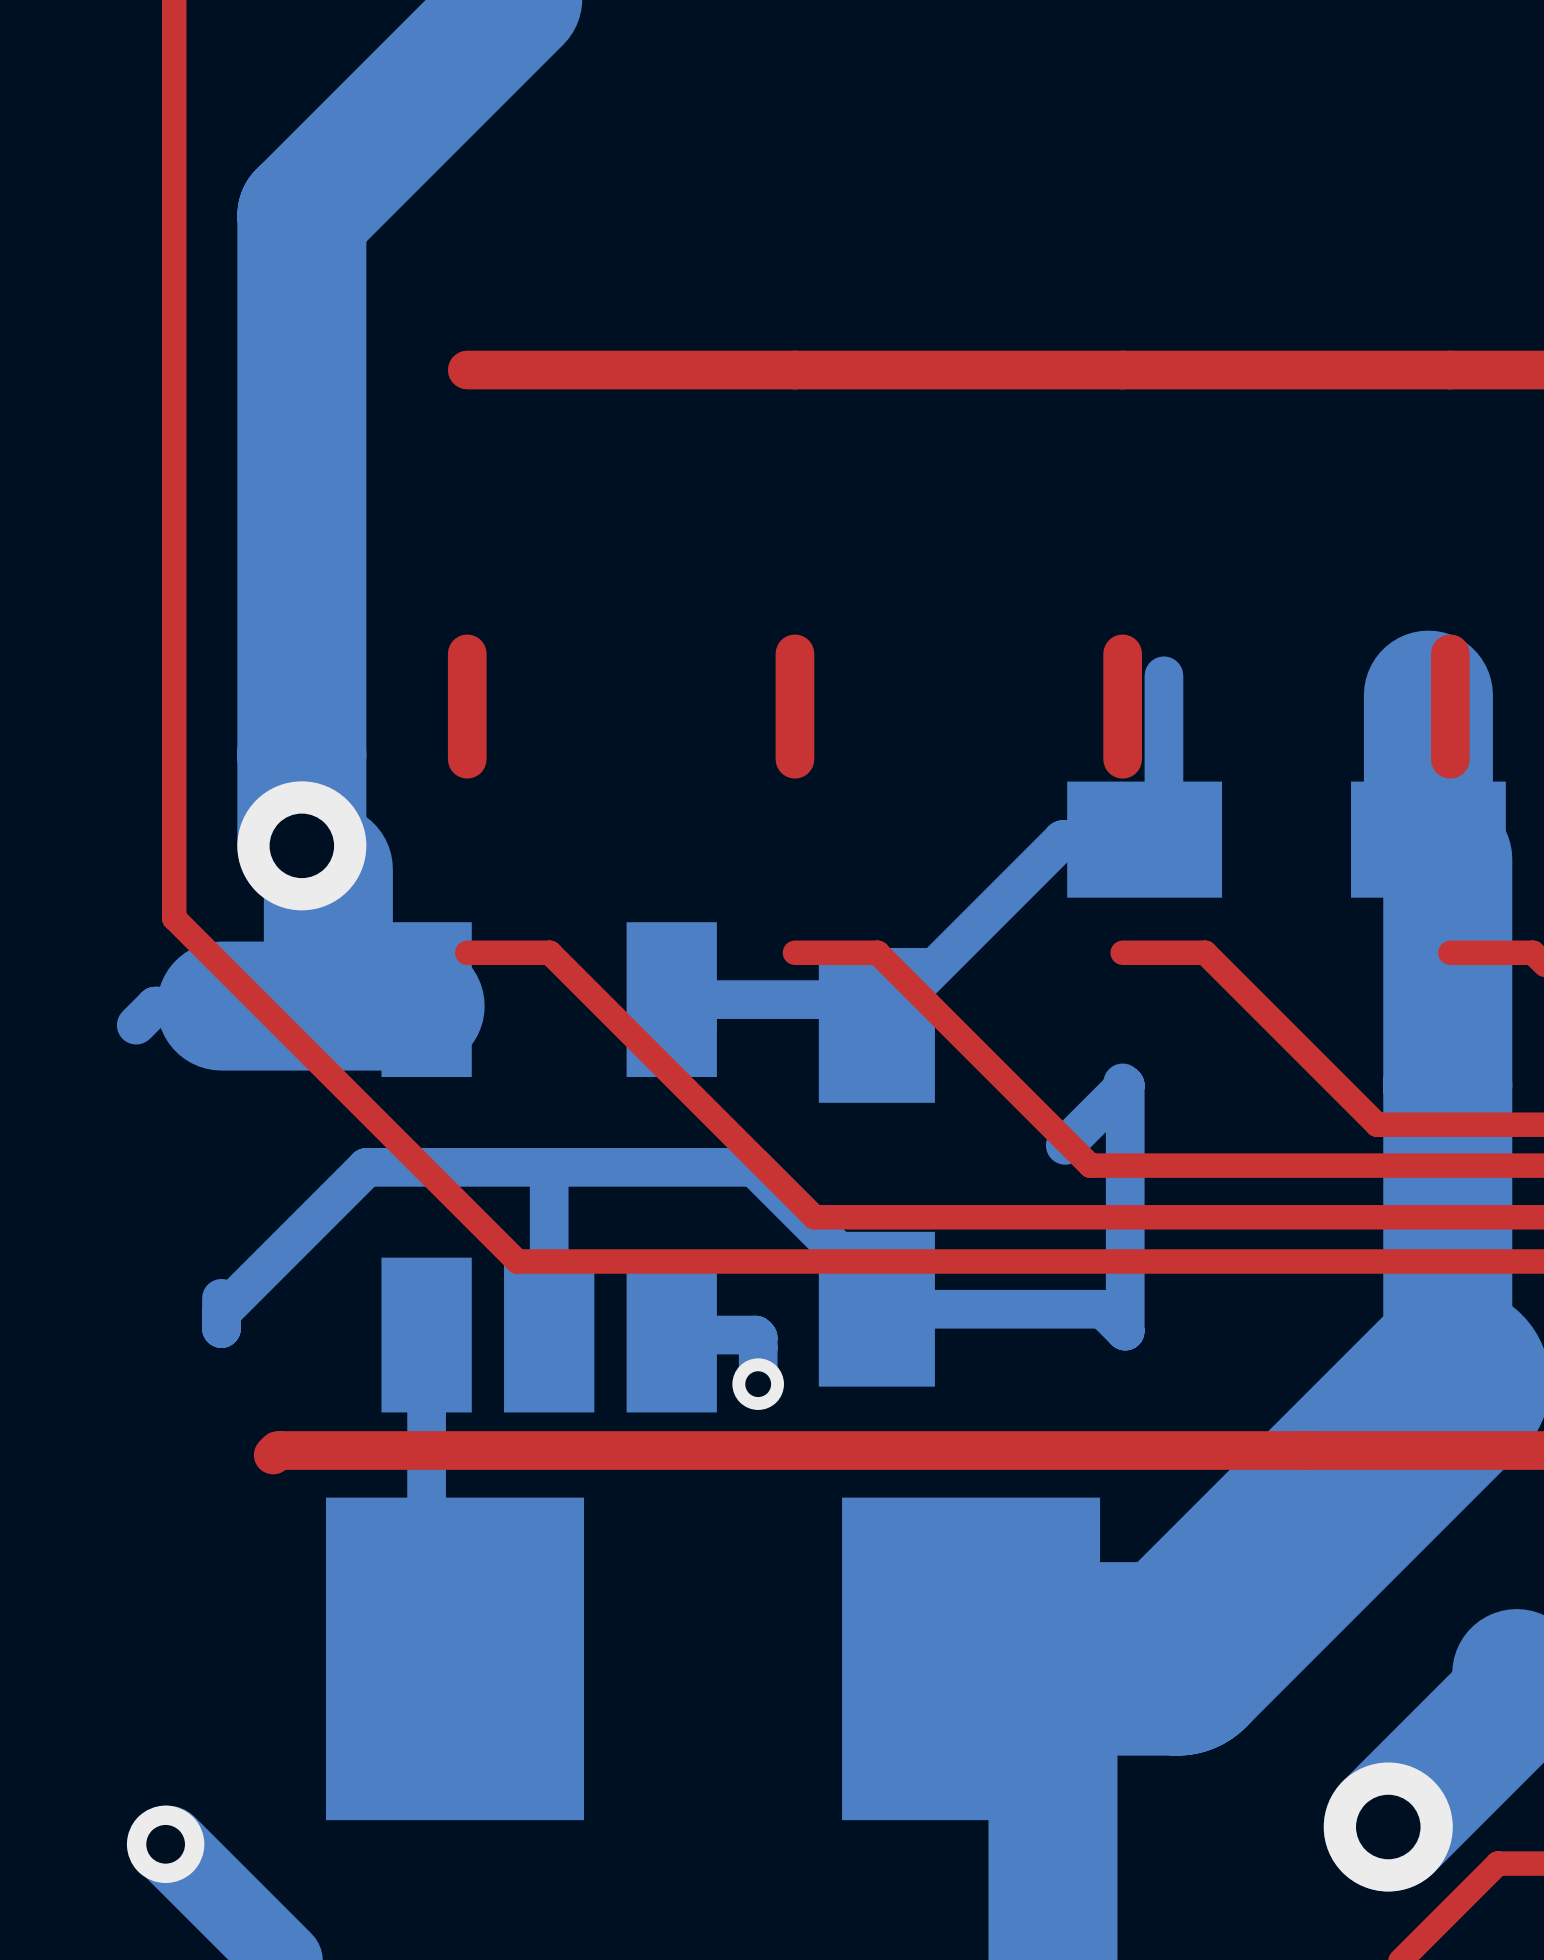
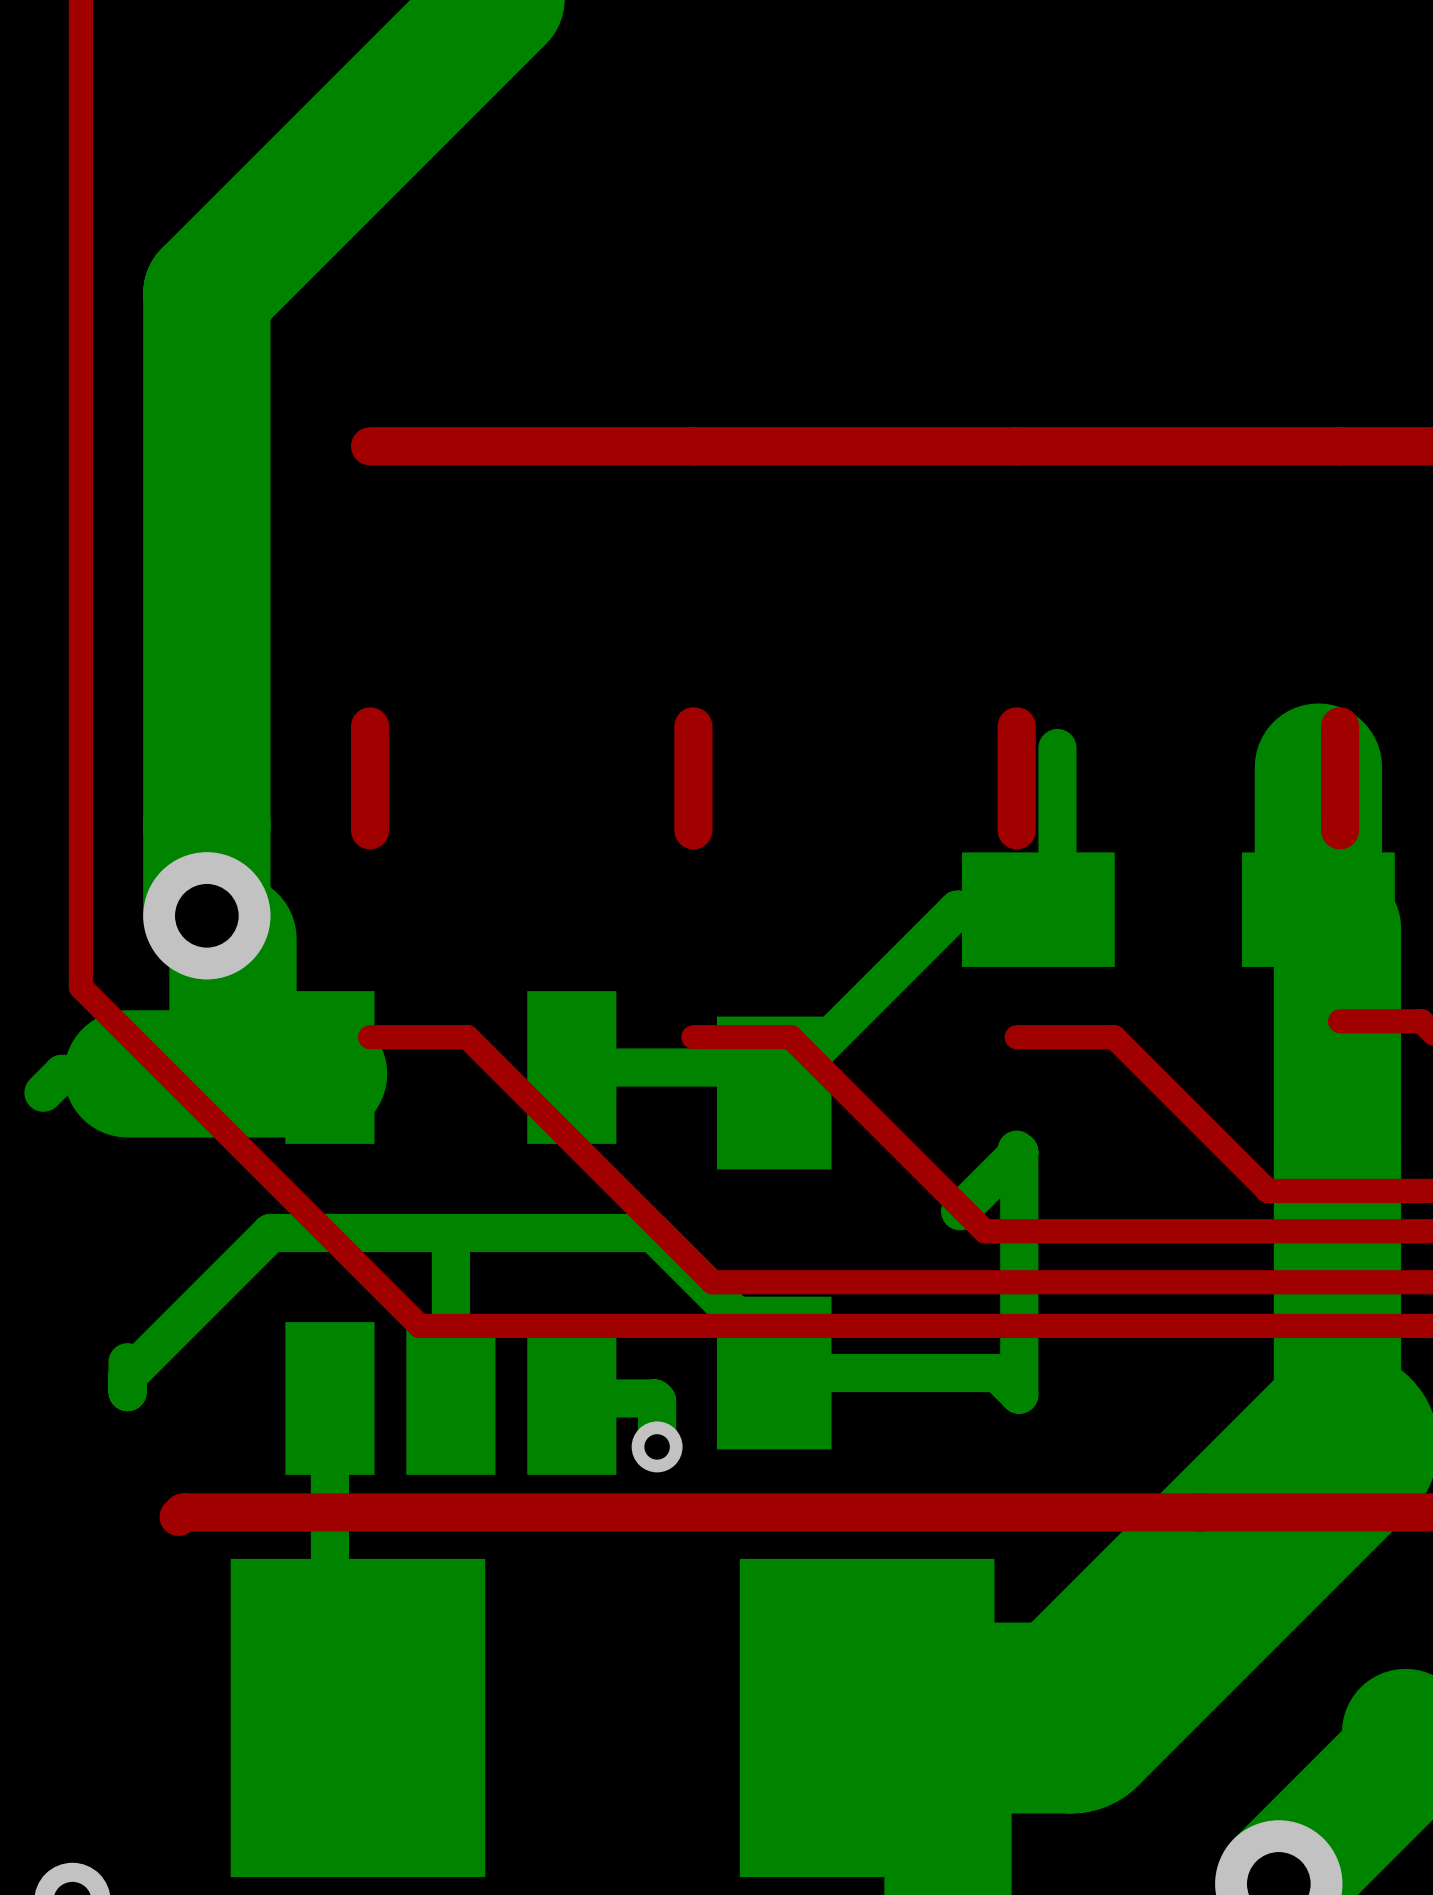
top track: (467, 952) (549, 952) (565, 968) -> (370, 1037) (467, 1037)
top track: (794, 952) (877, 952) (893, 968) -> (693, 1037) (790, 1037)
top track: (1122, 952) (1205, 952) (1221, 968) -> (1016, 1037) (1114, 1037)

